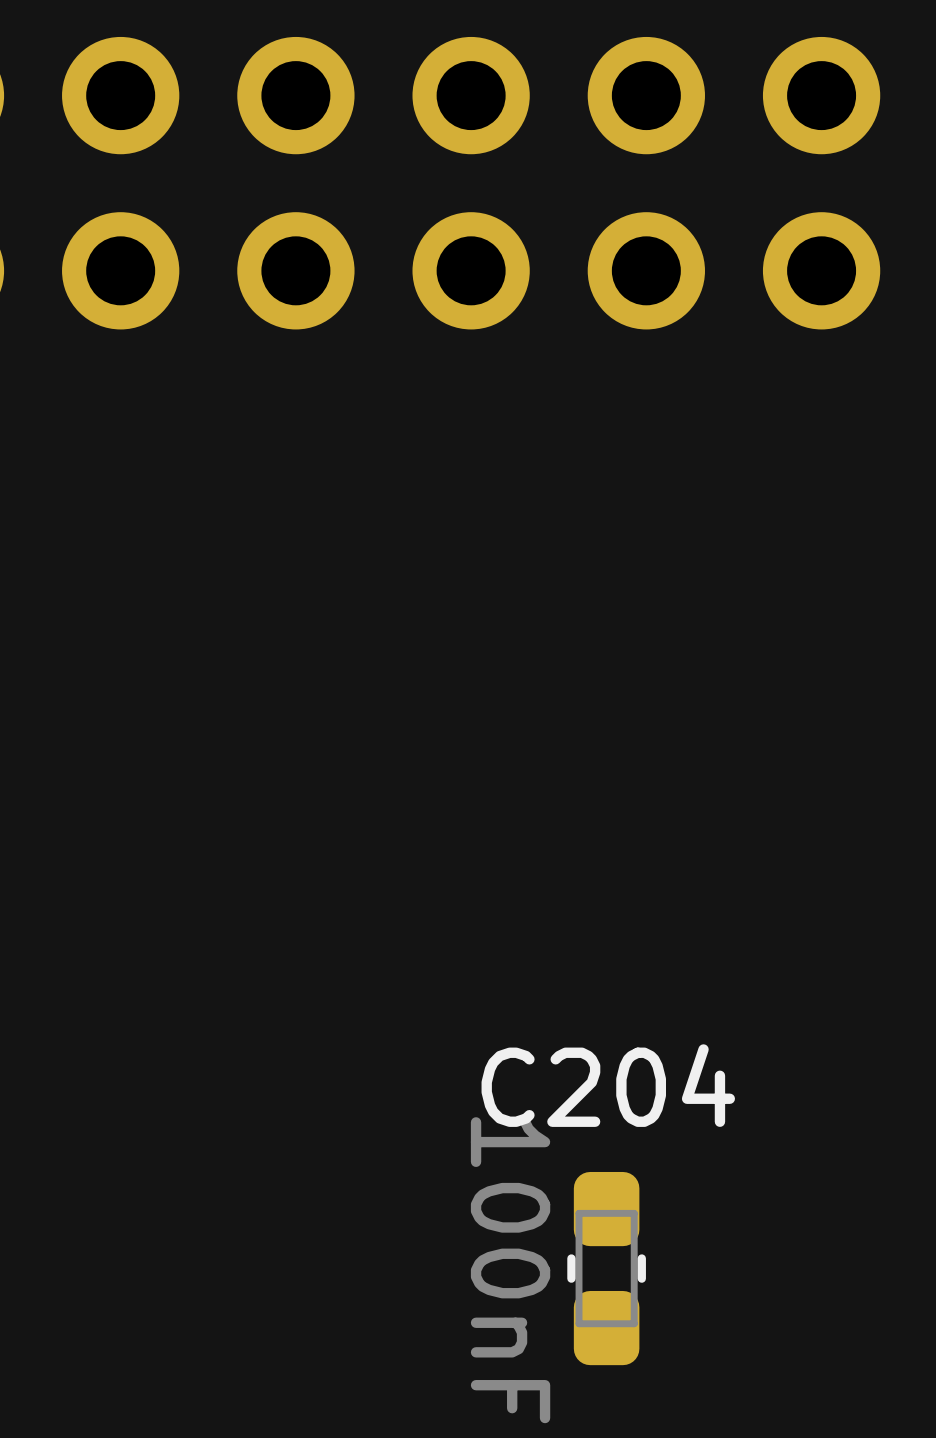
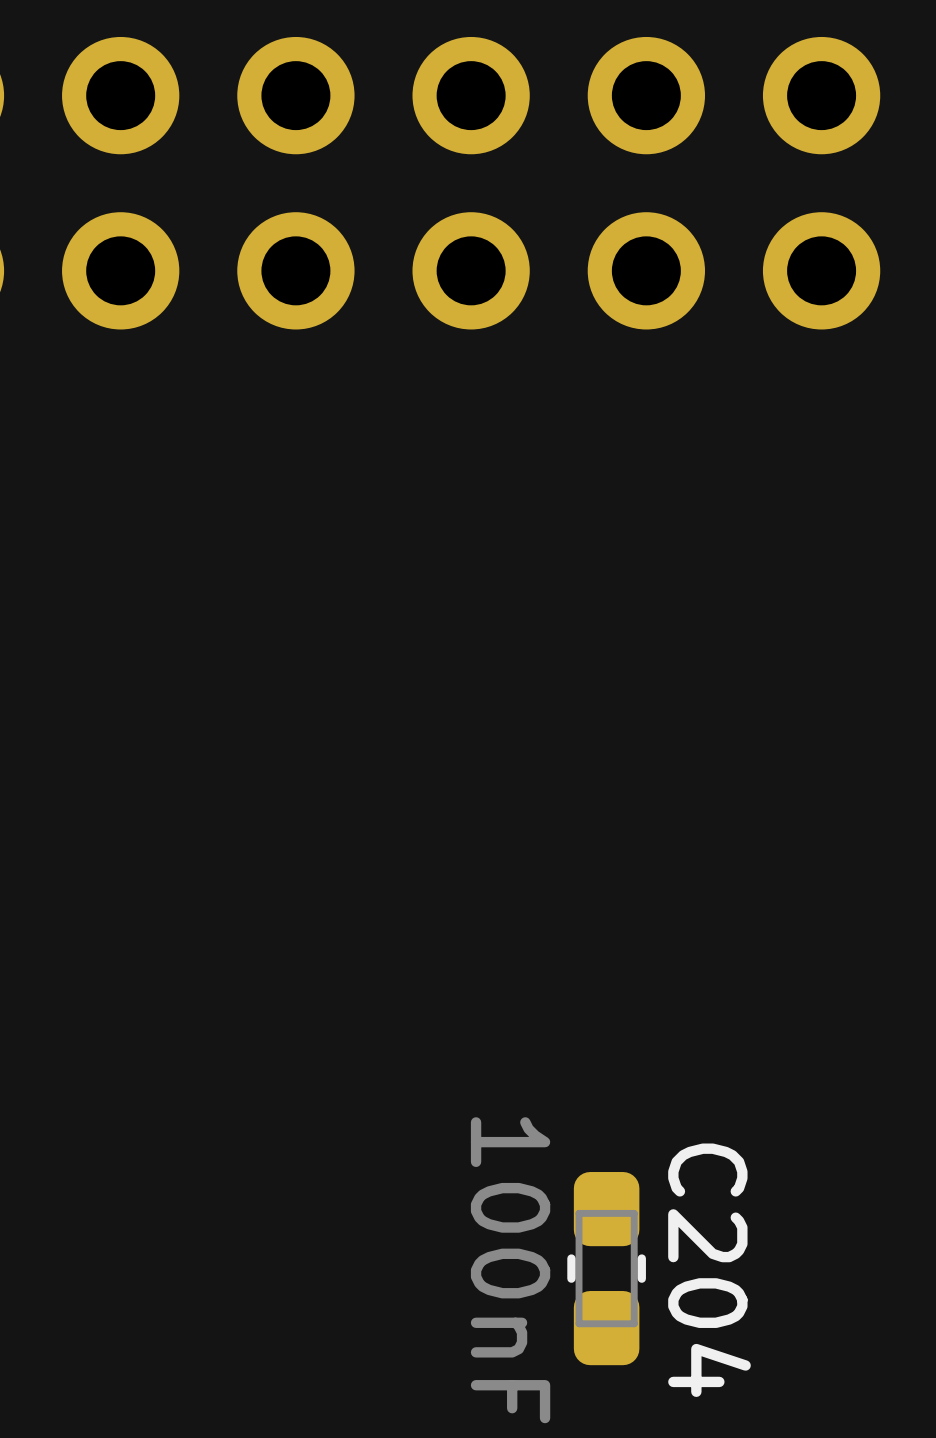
C204 name rotation: 0° (608, 1085) -> 90° clockwise (709, 1270)

